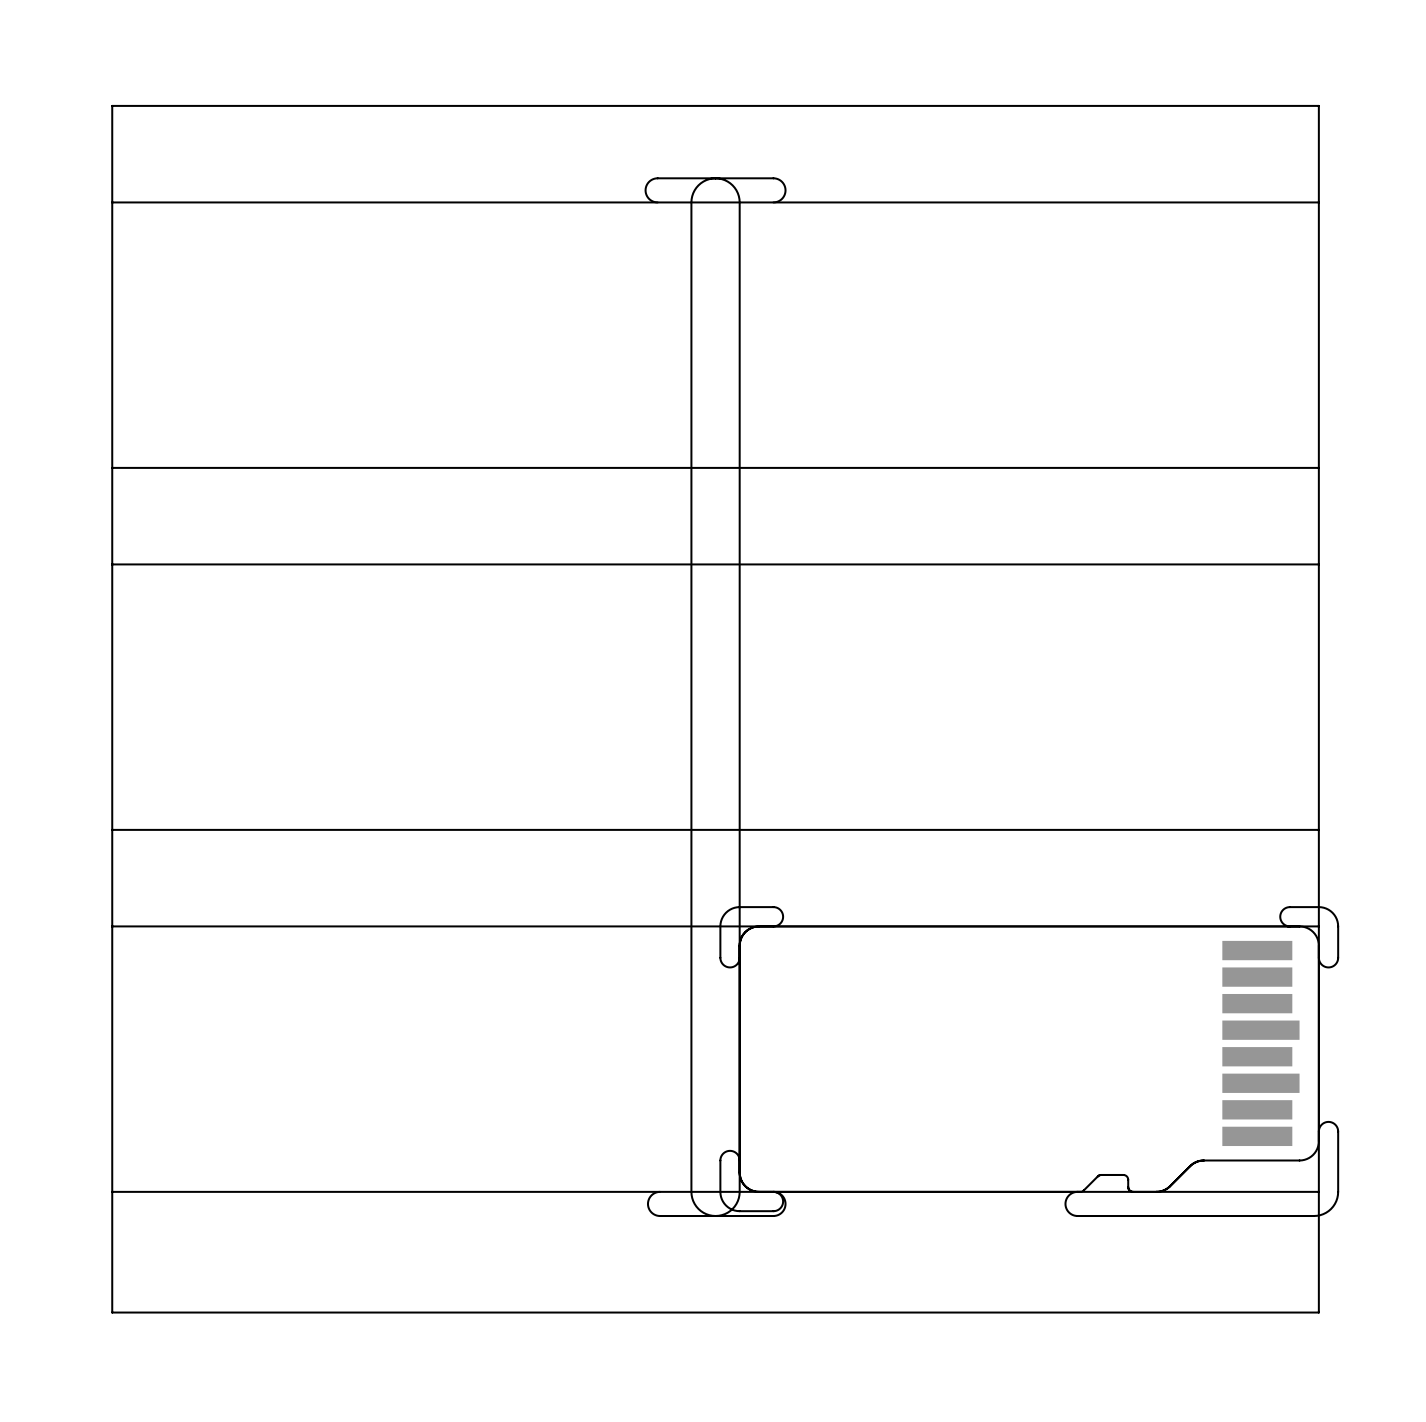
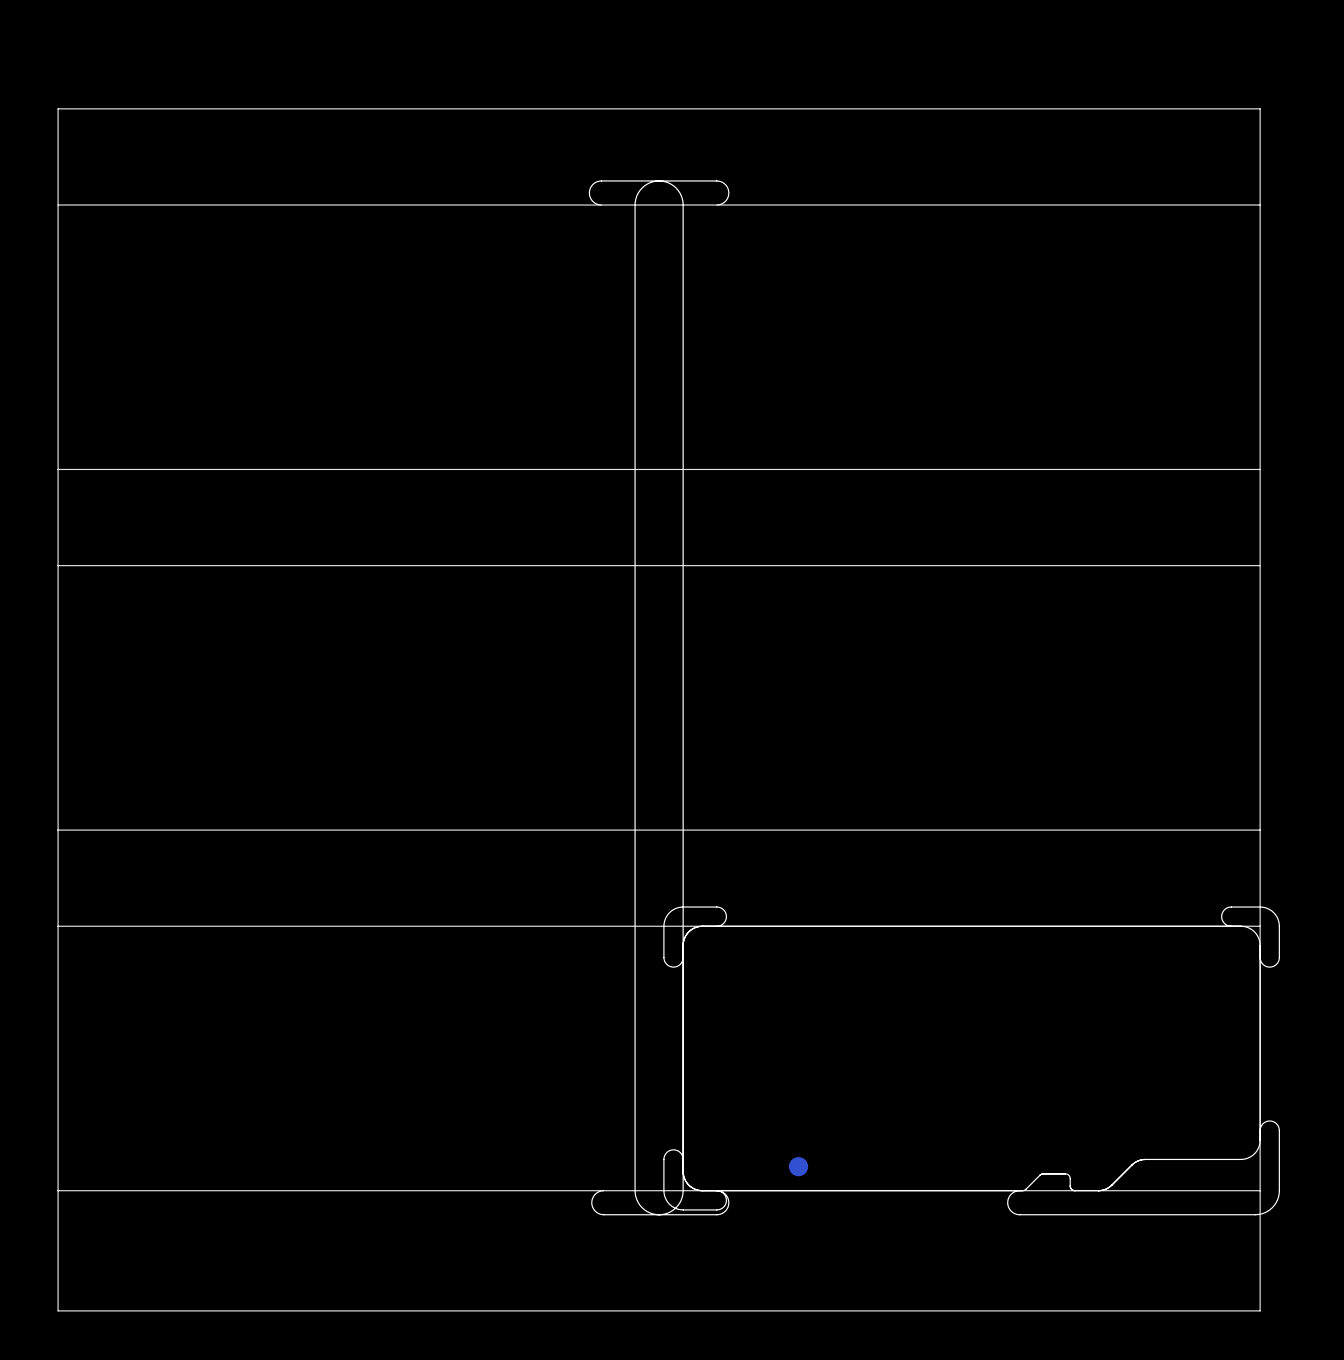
part footprint: [720, 907, 1339, 1217] -> [663, 907, 1280, 1215]
part: none -> (798, 1166)

